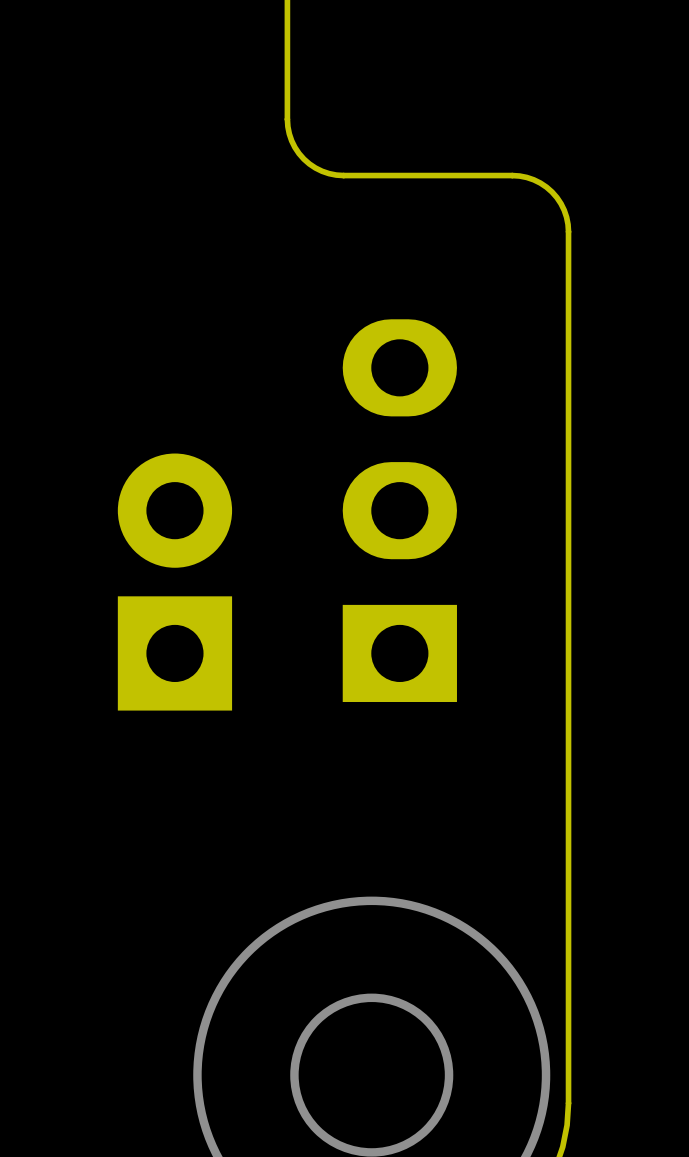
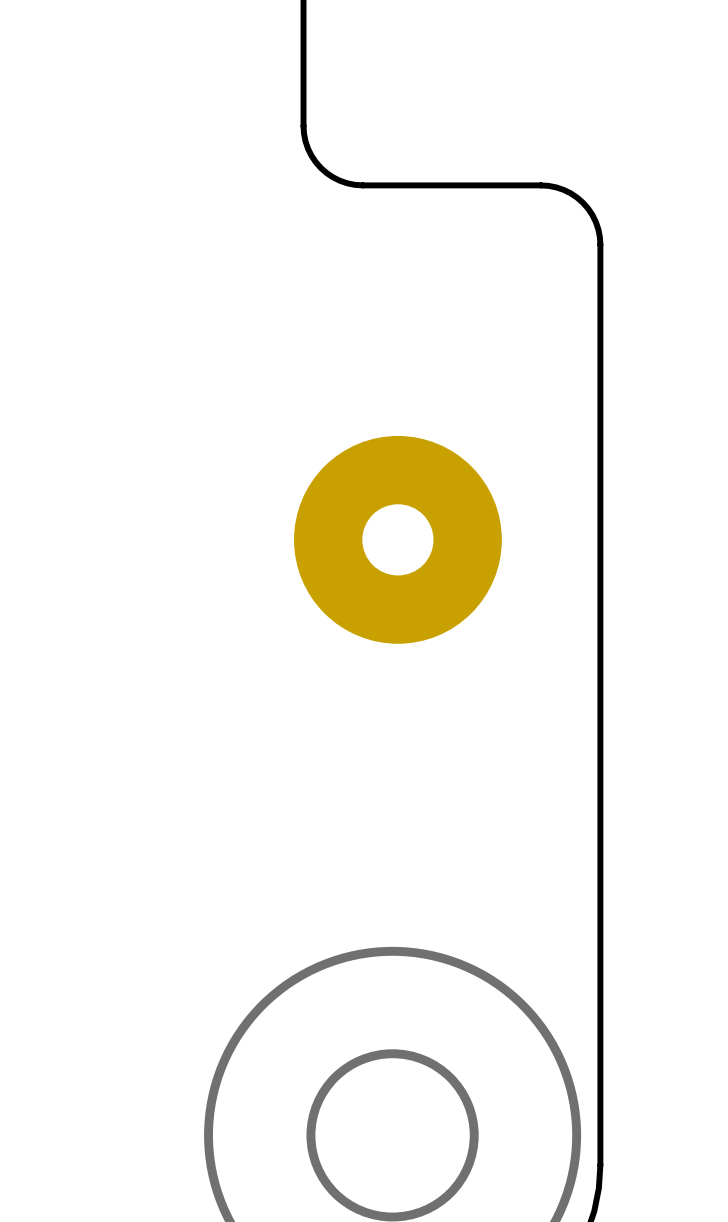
part footprint: [342, 319, 457, 703] -> [294, 435, 502, 644]
part: (174, 582) -> none

